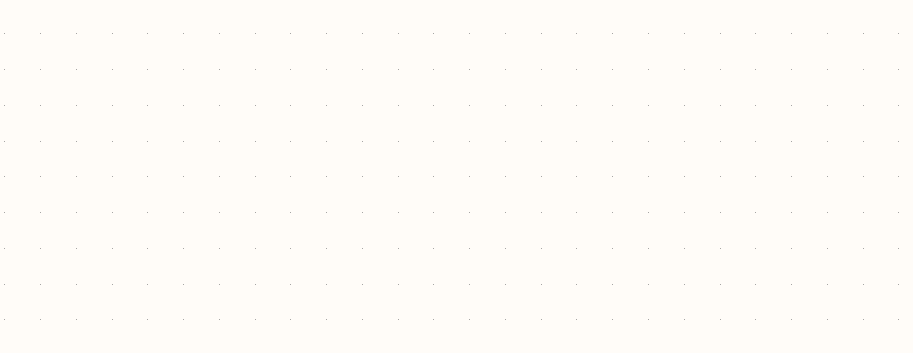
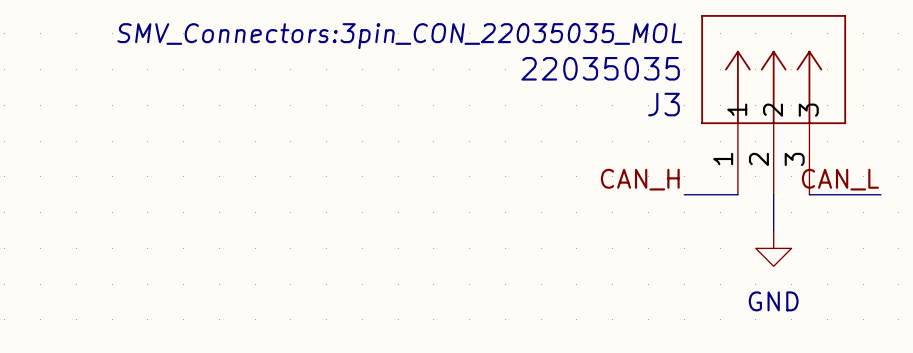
J3: none -> 22035035 (773, 104)
label: none -> CAN_H (640, 179)
label: none -> CAN_L (840, 179)
wire: none -> (684, 194) (737, 194)
wire: none -> (773, 194) (773, 230)
wire: none -> (809, 194) (880, 194)
power symbol: none -> GND (773, 248)

